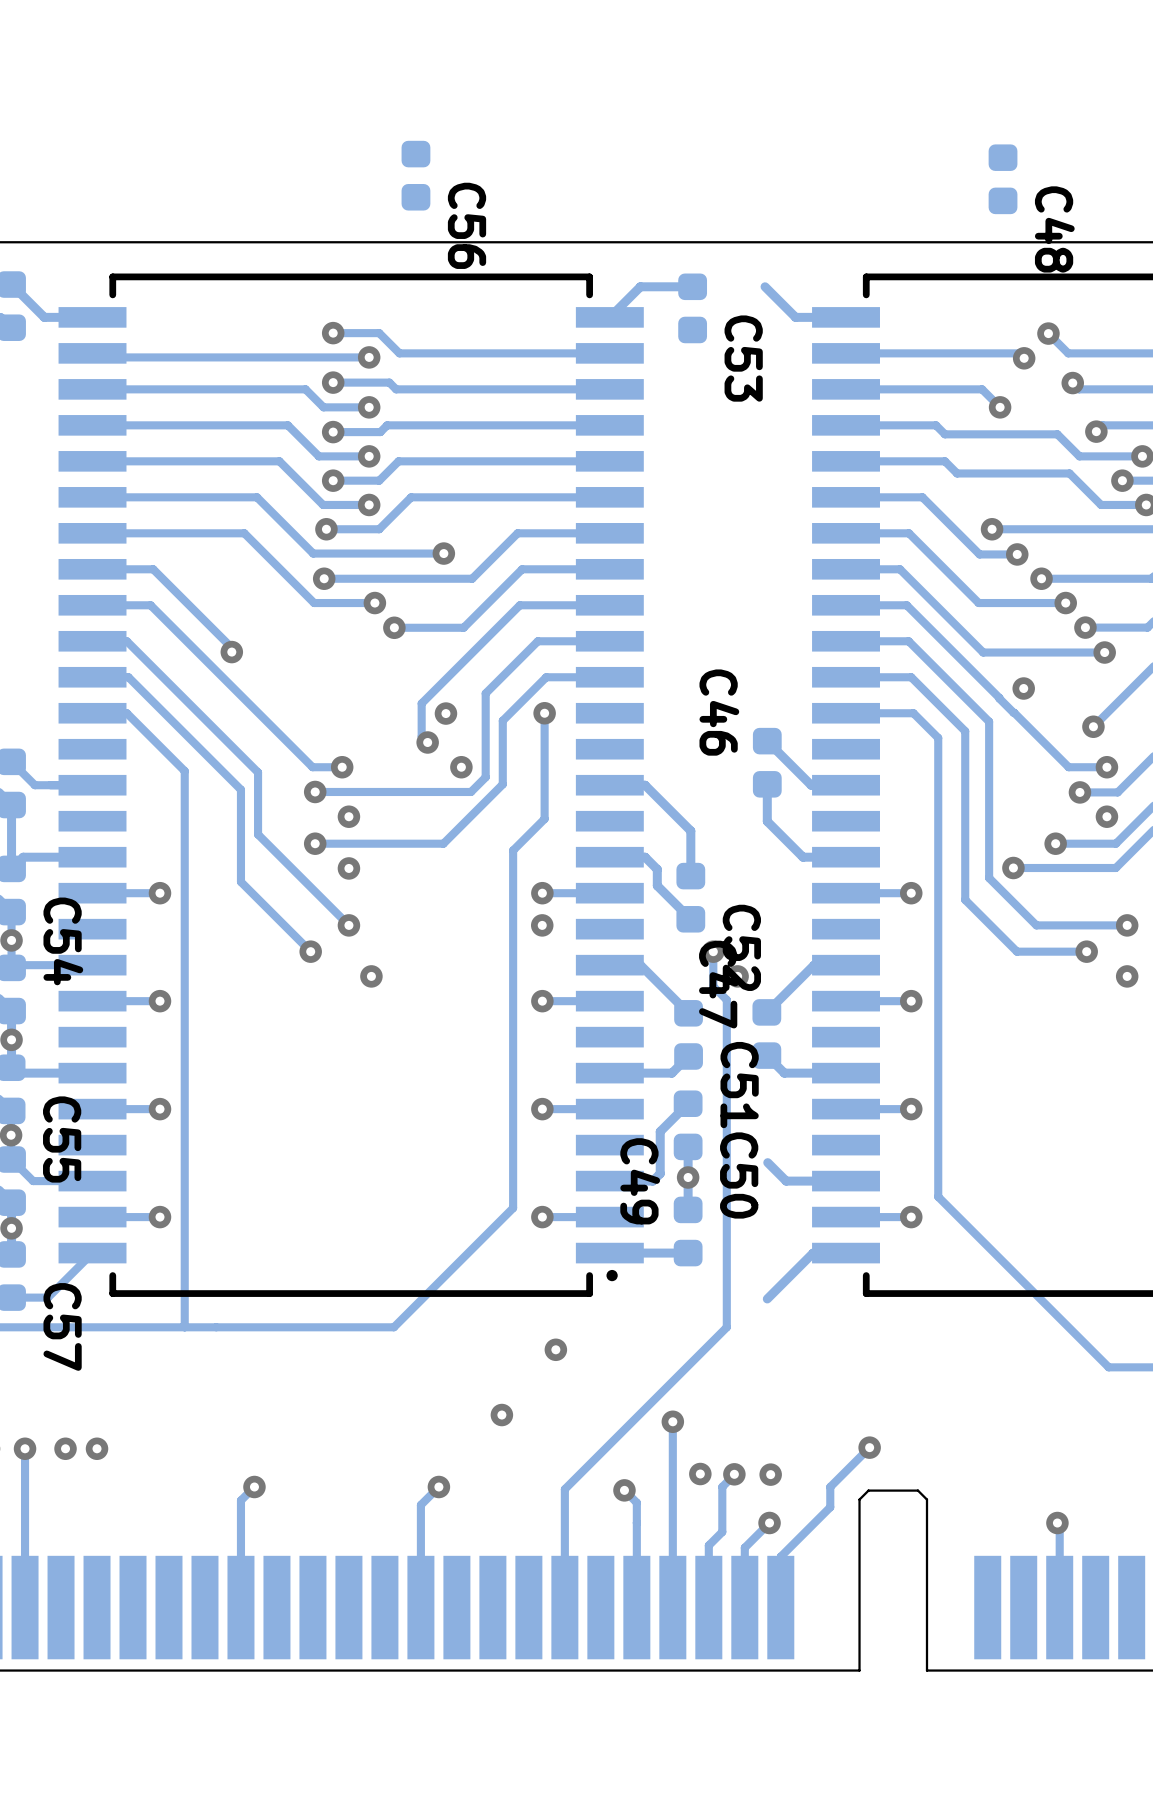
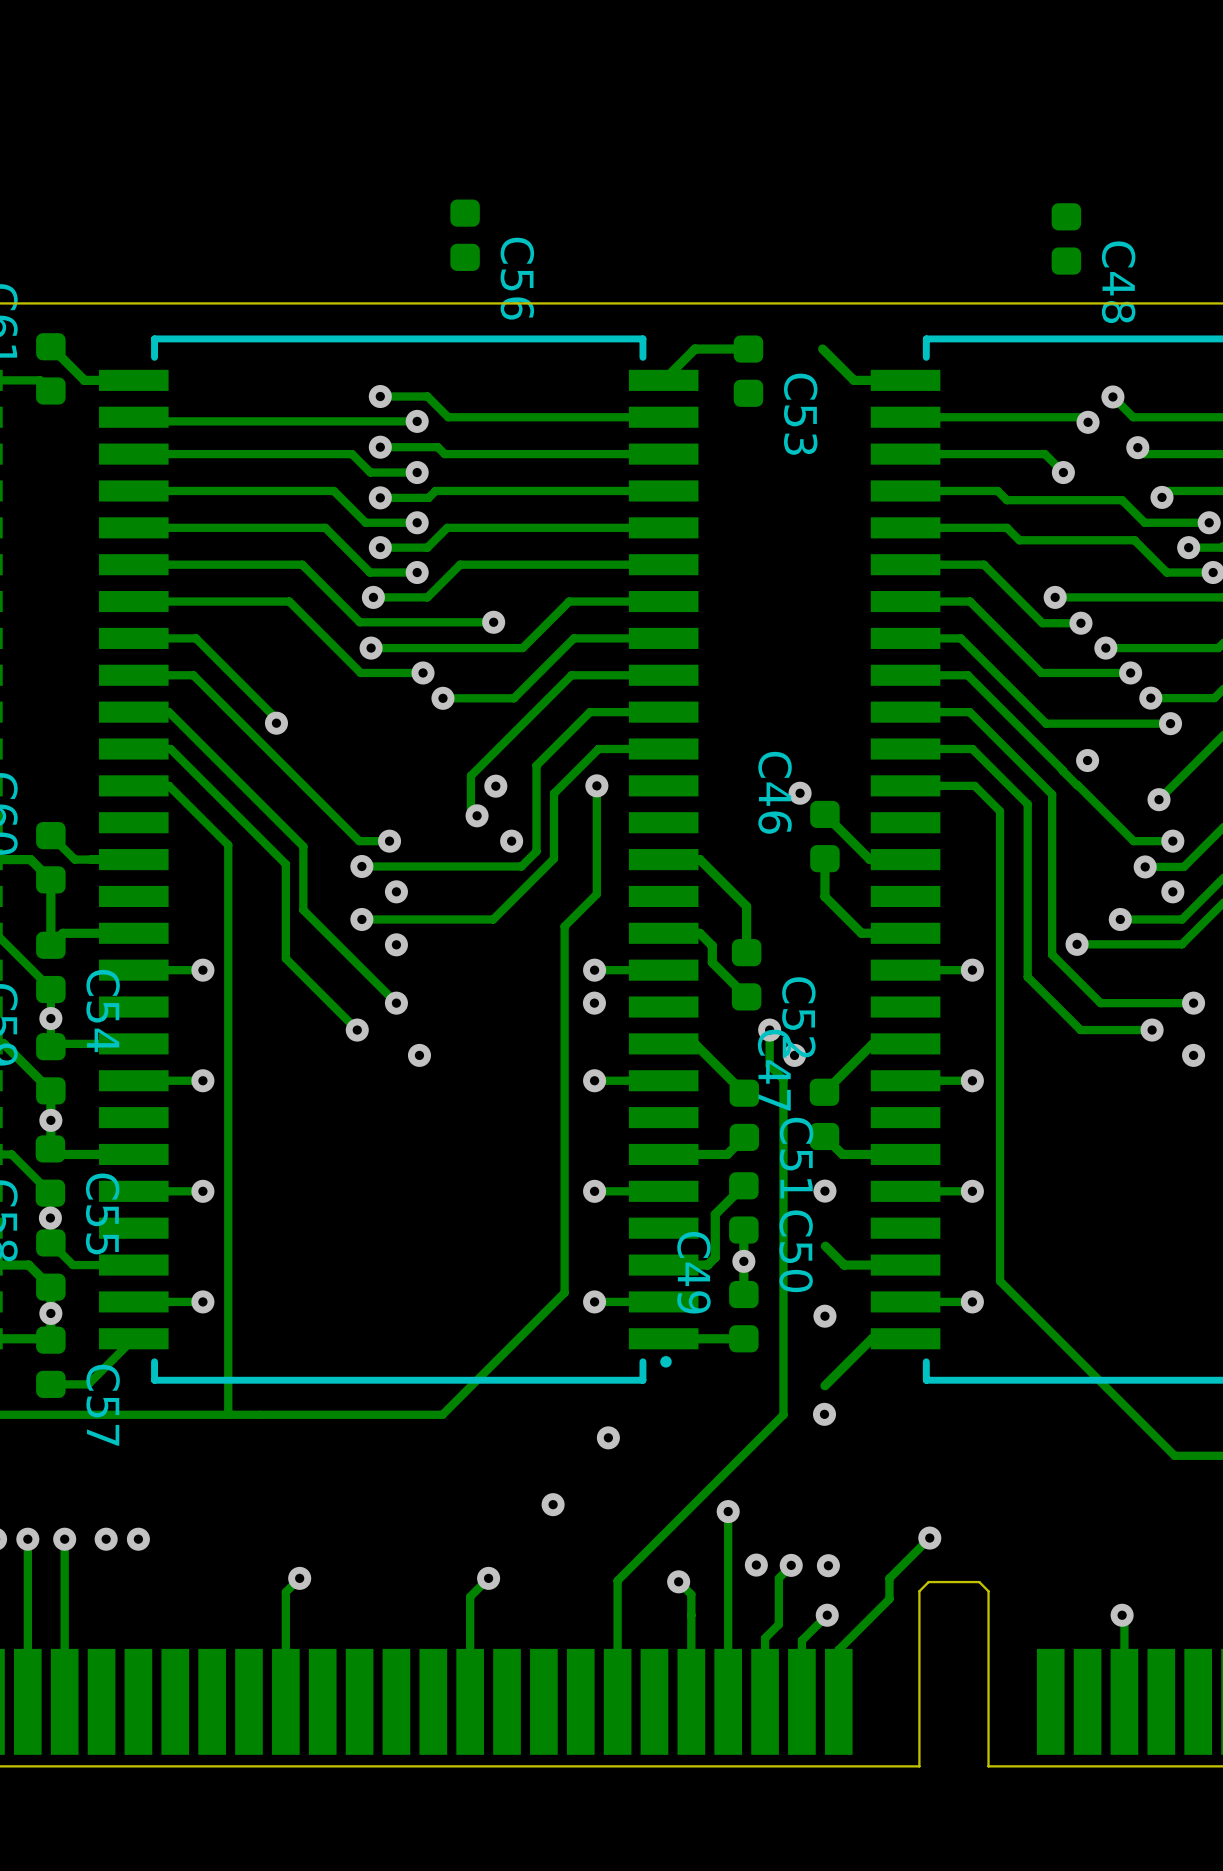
via: none -> (800, 793)
via: none -> (824, 1191)
via: none -> (824, 1316)
via: none -> (824, 1414)

